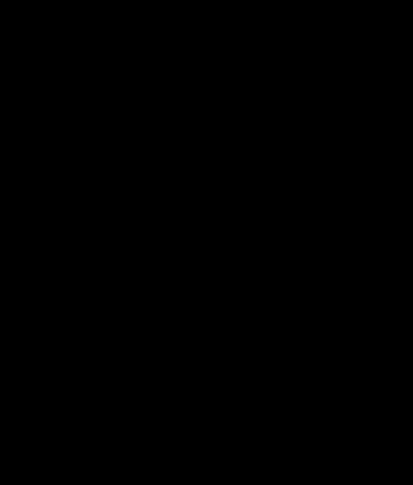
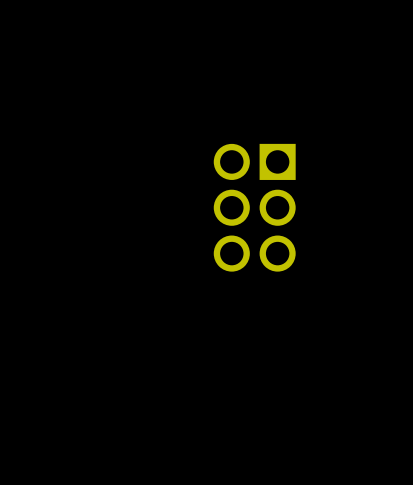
part: none -> (254, 207)

